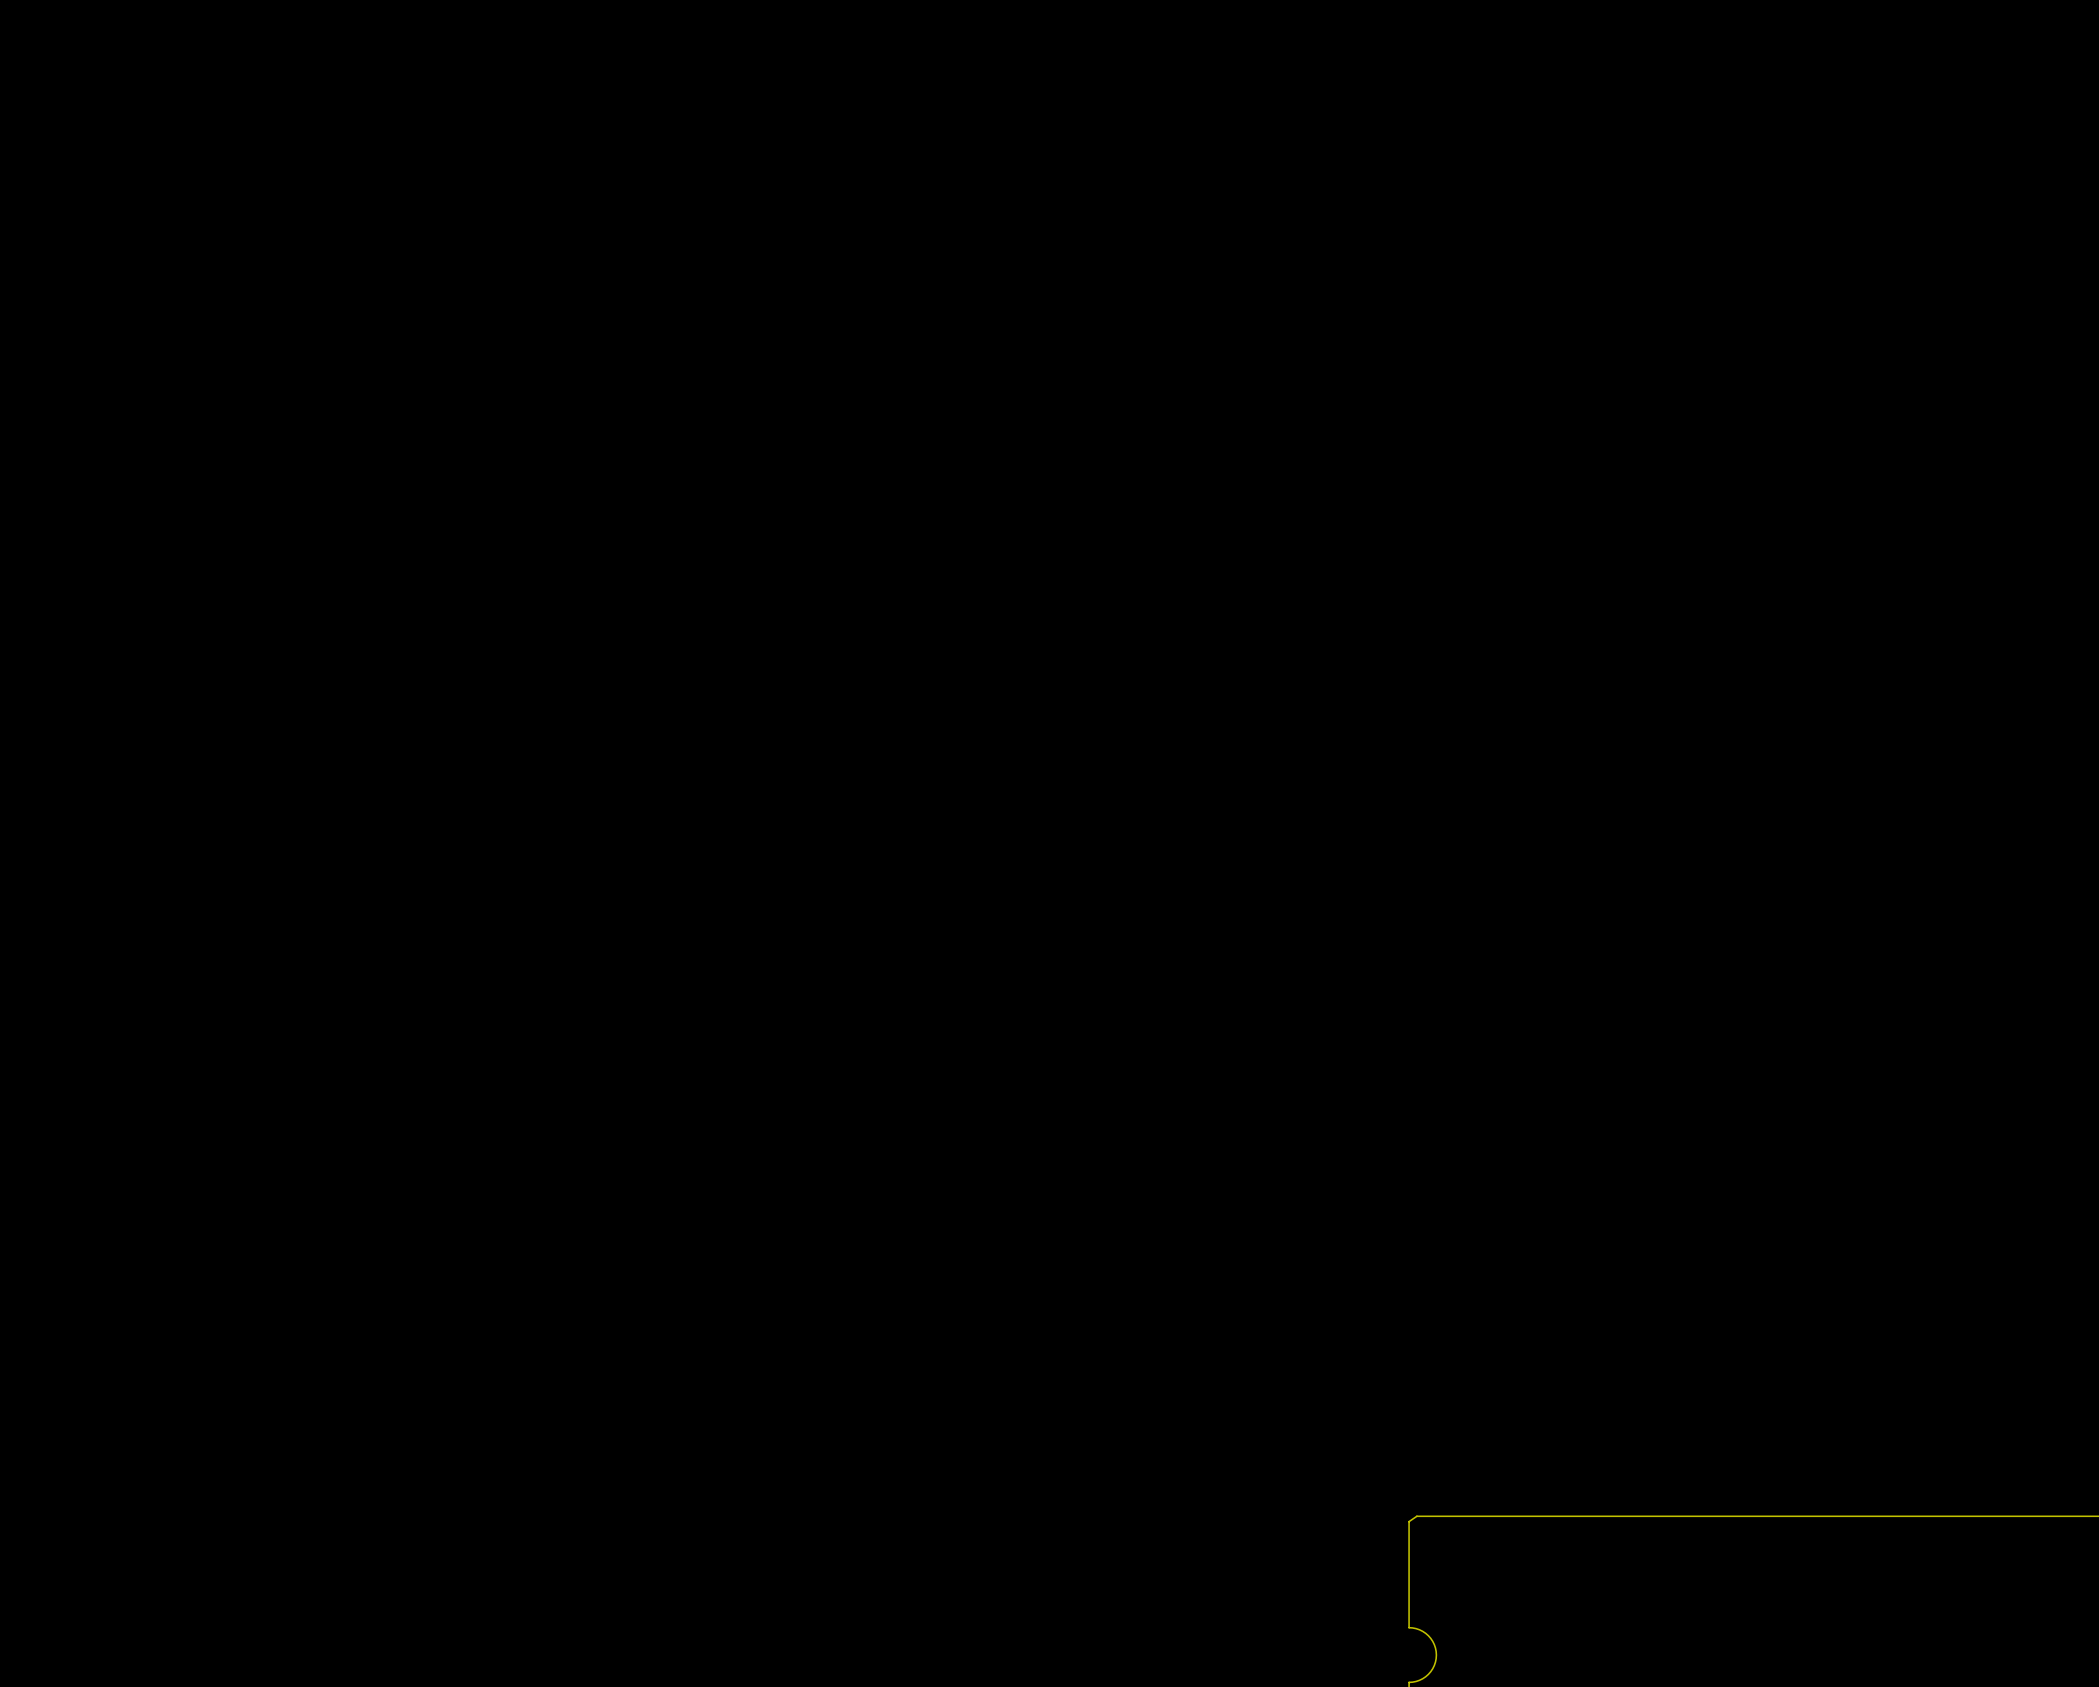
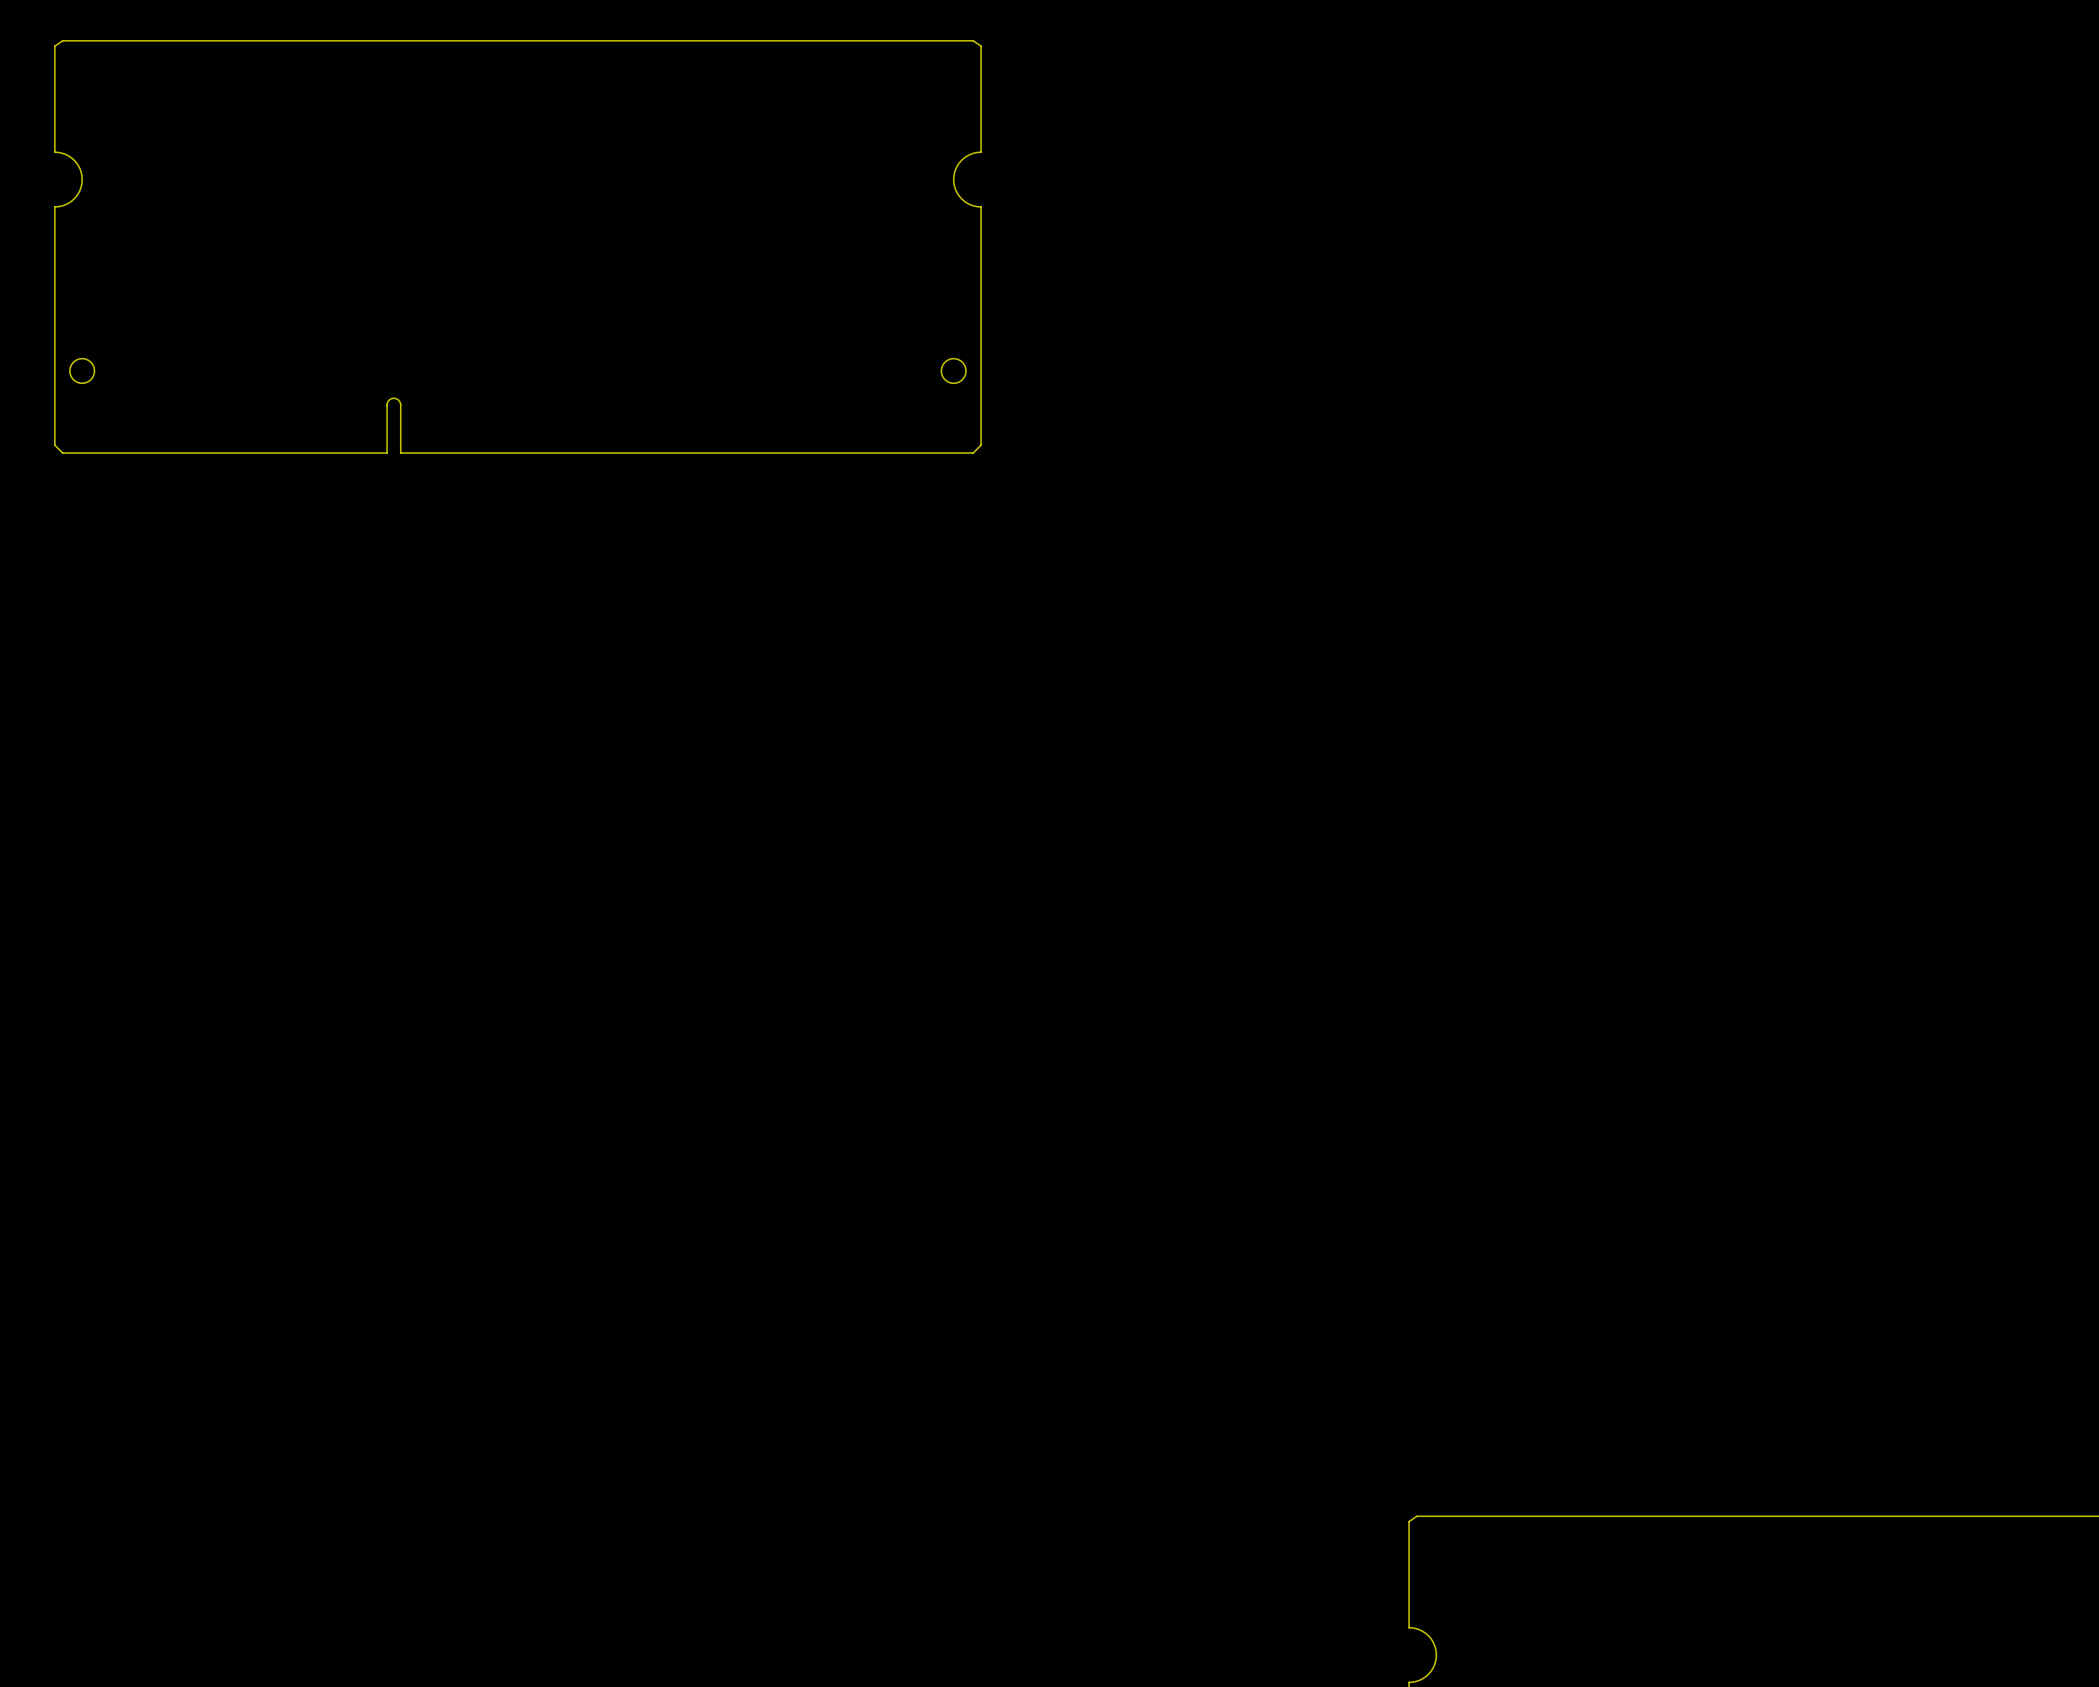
board edge: none -> (62, 40) (973, 40) (981, 46) (981, 152) (970, 154) (961, 160) (955, 169) (953, 179) (955, 190) (961, 198) (970, 204) (981, 206) (981, 445) (973, 453) (400, 453) (400, 404) (398, 399) (393, 398) (389, 399) (387, 404) (387, 453) (62, 453) (54, 445) (54, 206) (65, 204) (74, 198) (80, 190) (82, 179) (80, 169) (74, 160) (65, 154) (54, 152) (54, 46) (62, 40)
round board edge: none -> [69, 358, 95, 384]
round board edge: none -> [941, 358, 967, 384]

